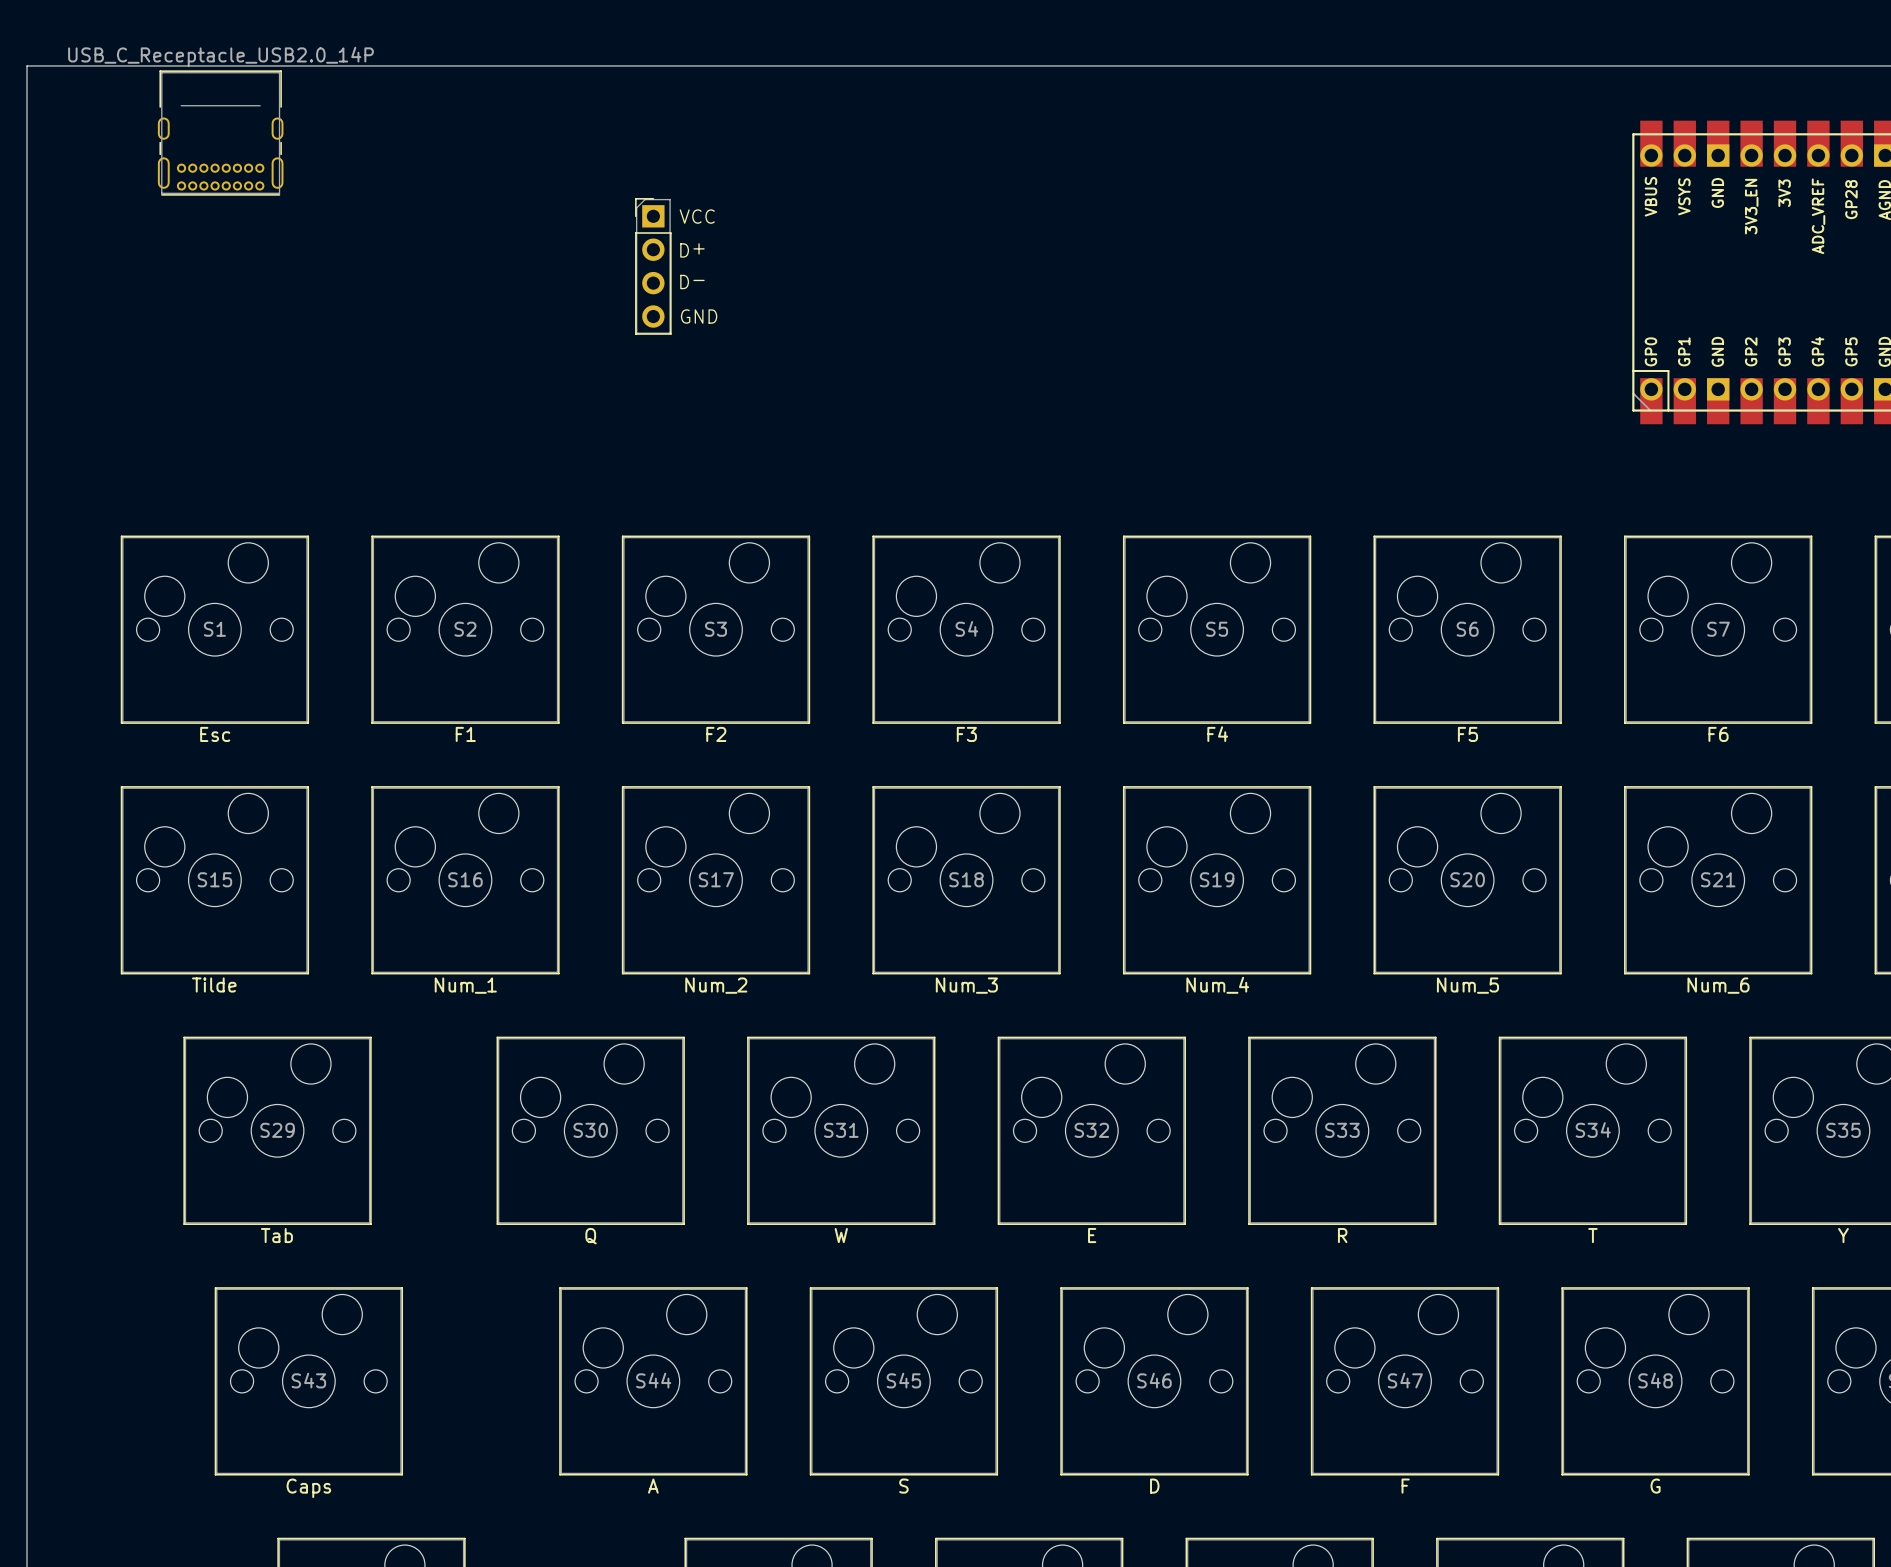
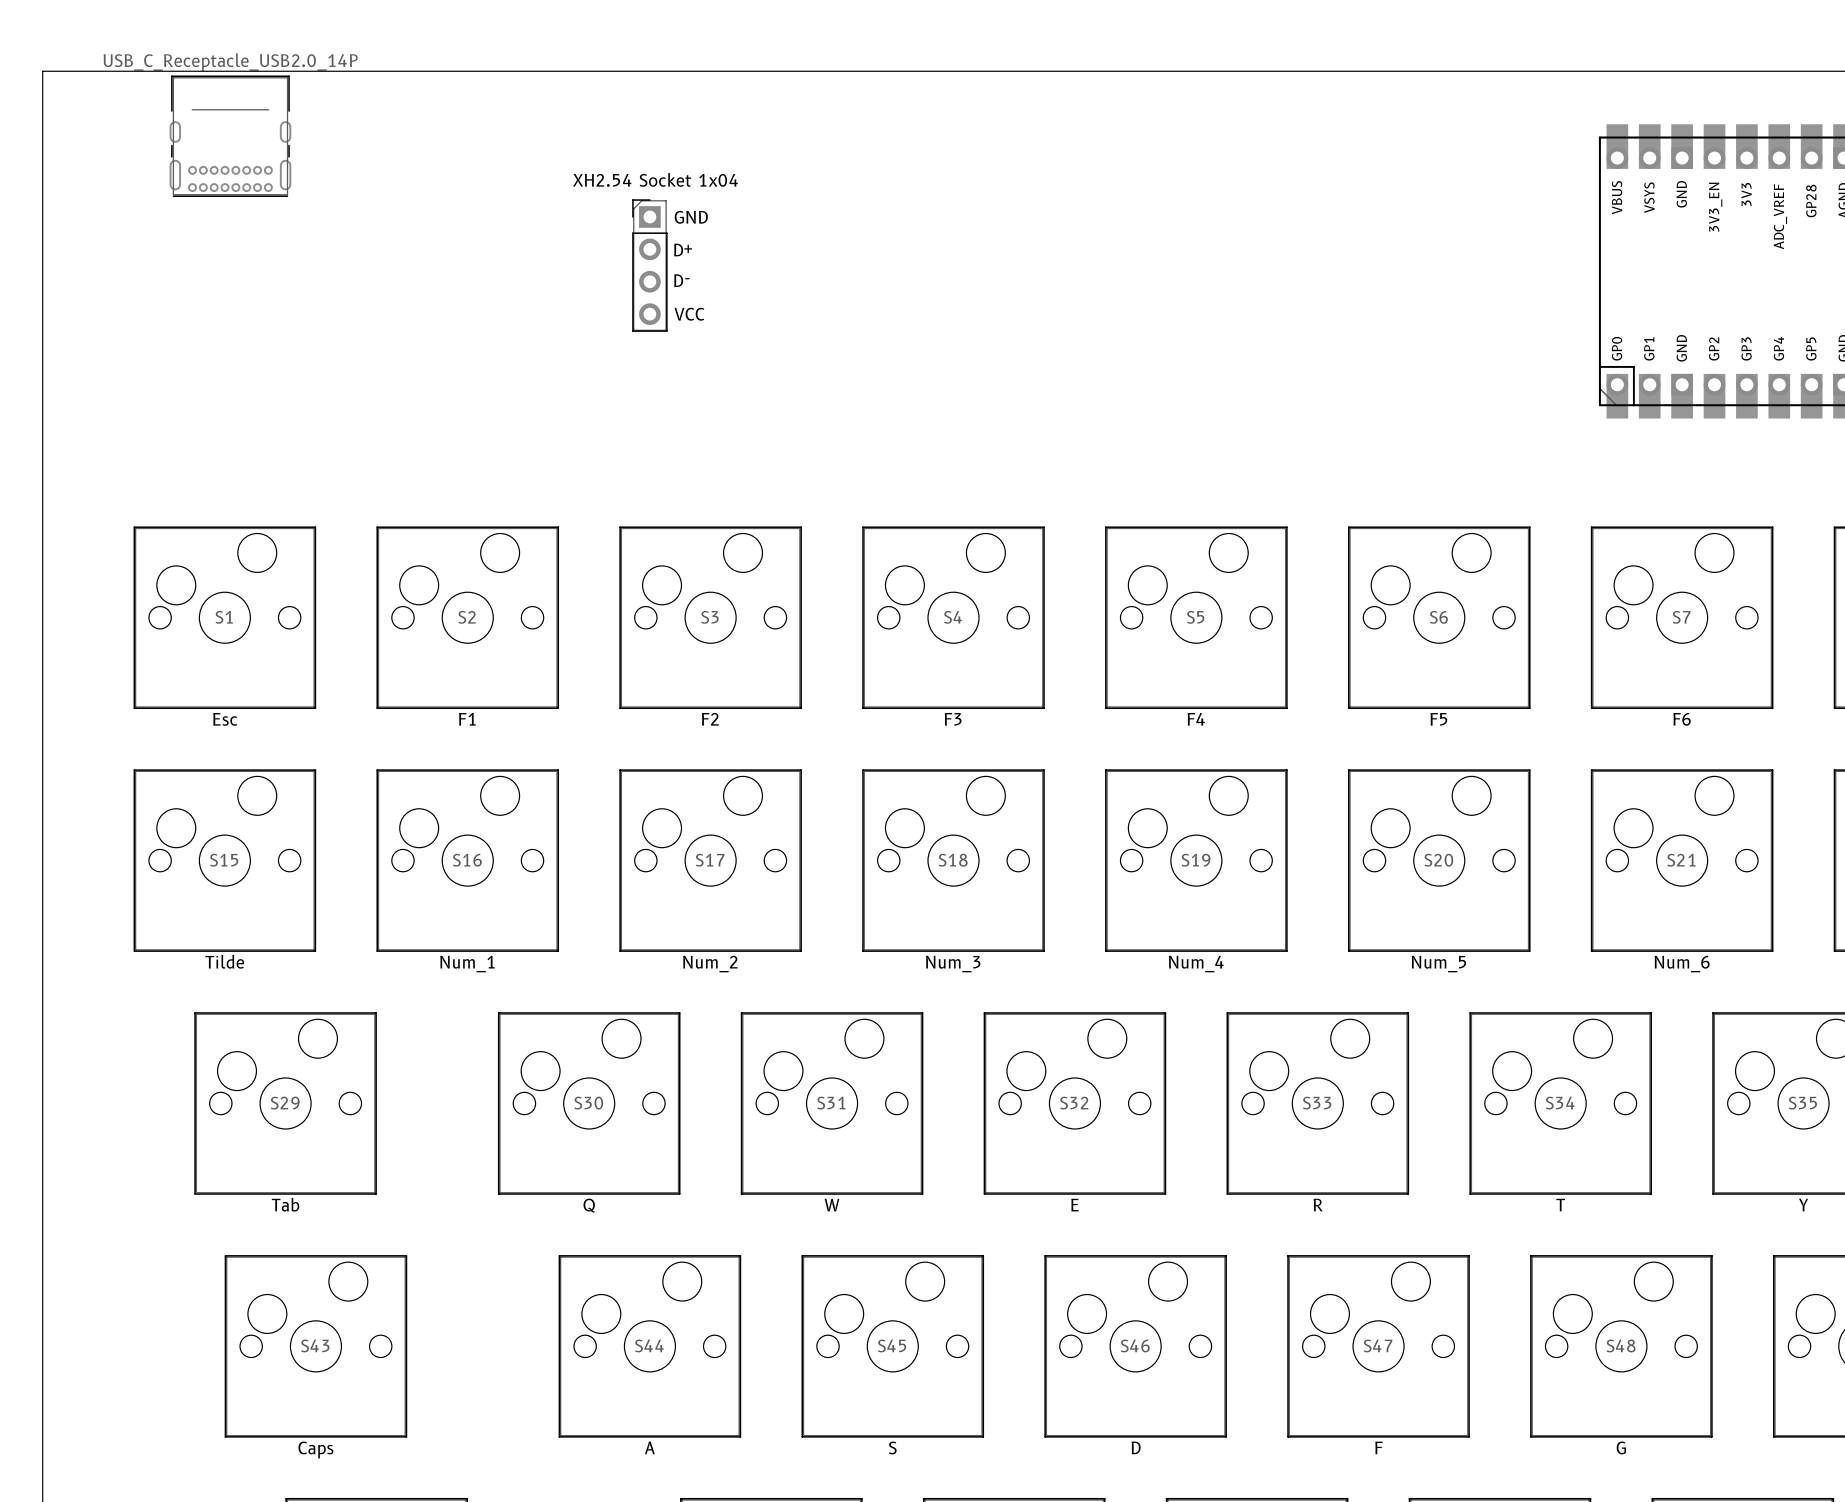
part value: none -> XH2.54 Socket 1x04 (655, 179)
text: VCC (697, 216) -> GND (691, 217)
text: GND (699, 316) -> VCC (689, 314)

